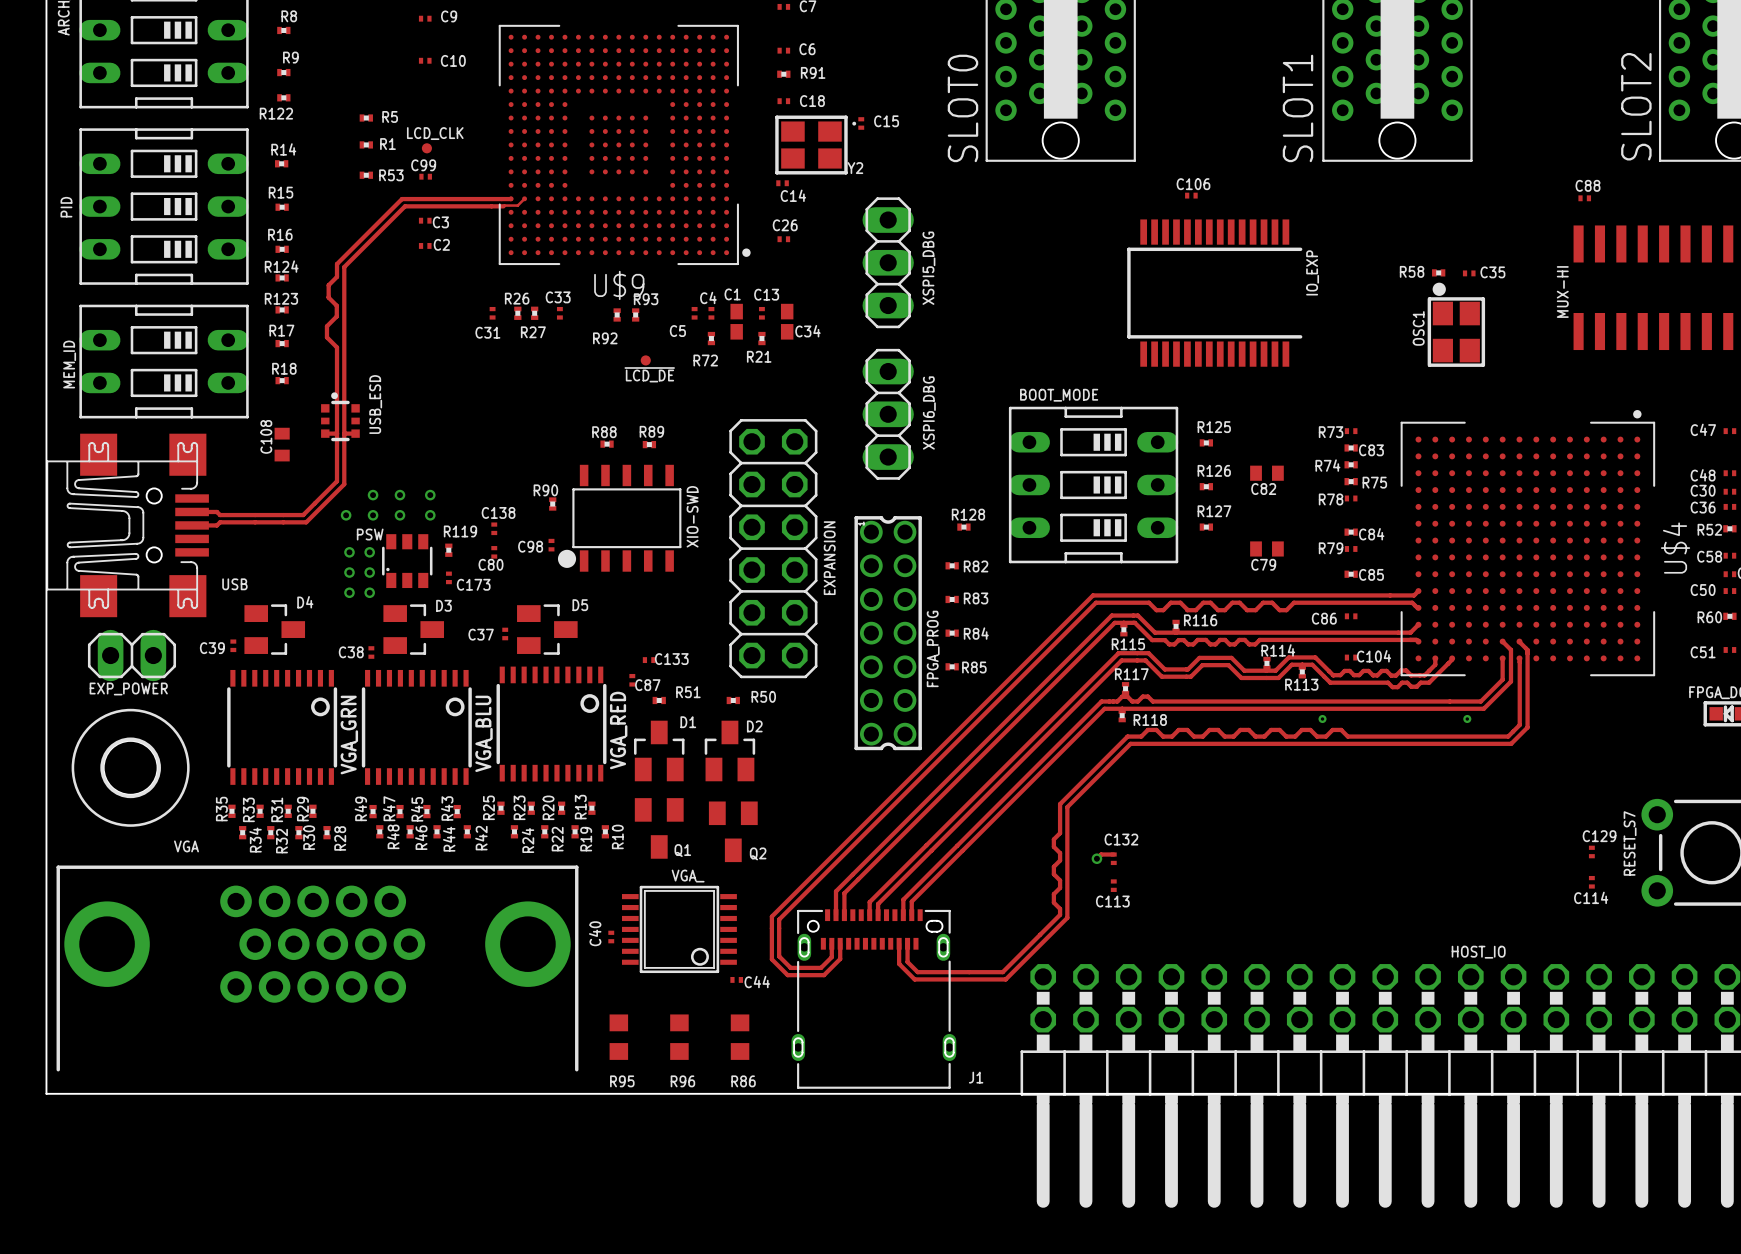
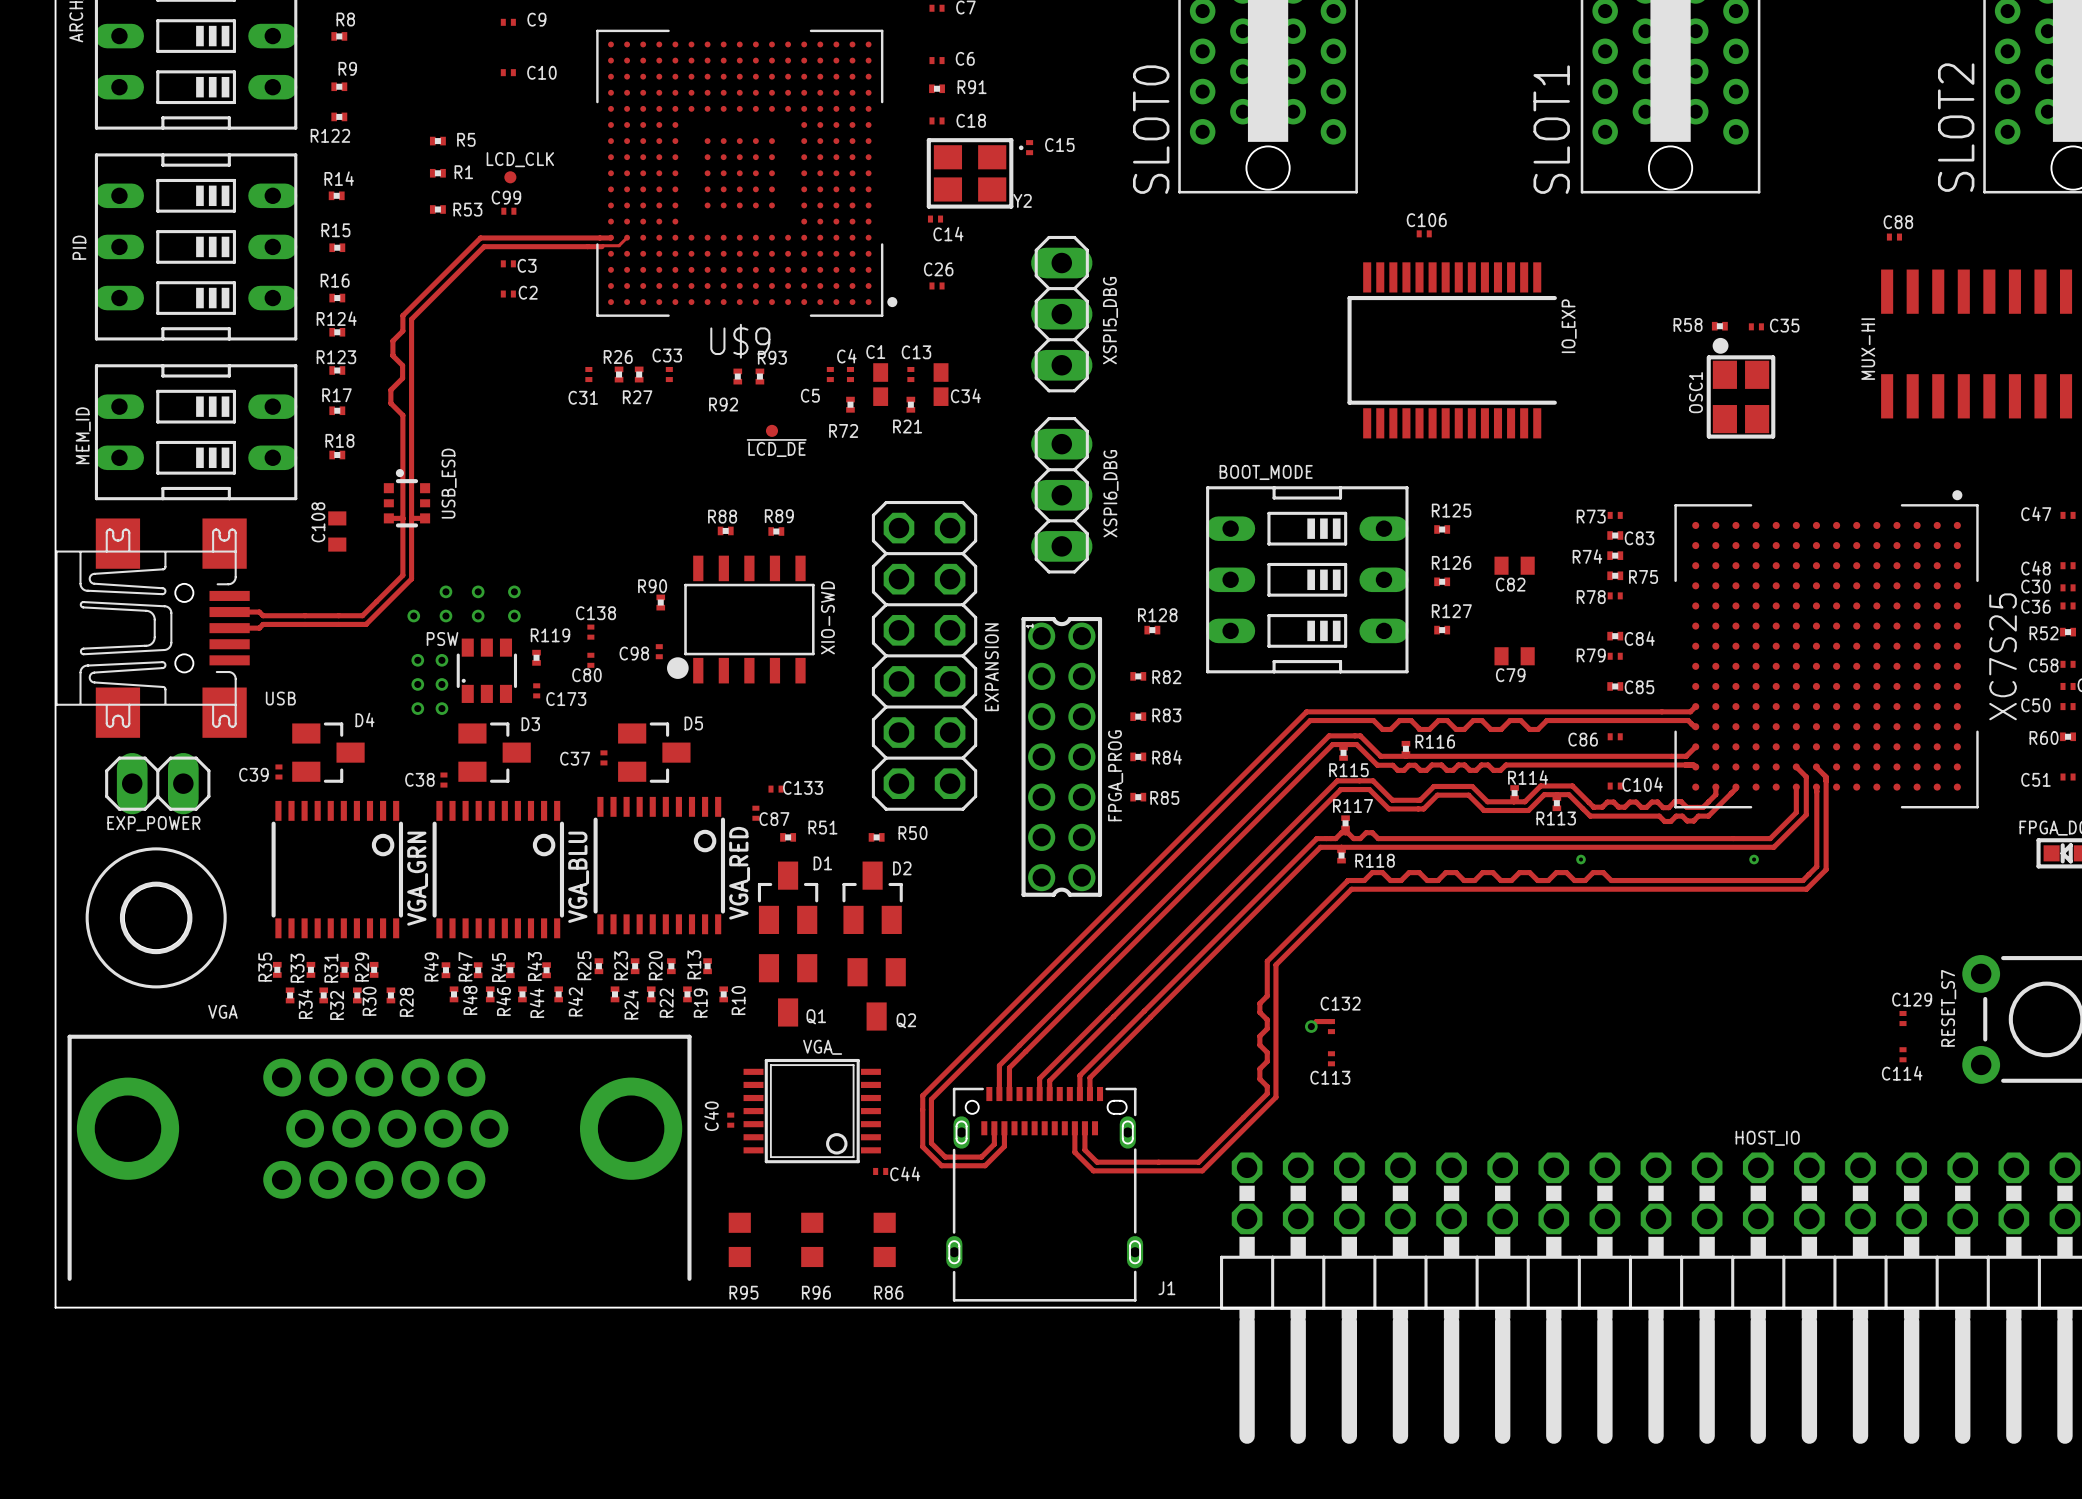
U$4 name: U$4 (1675, 548) -> XC7S25 (2003, 656)

